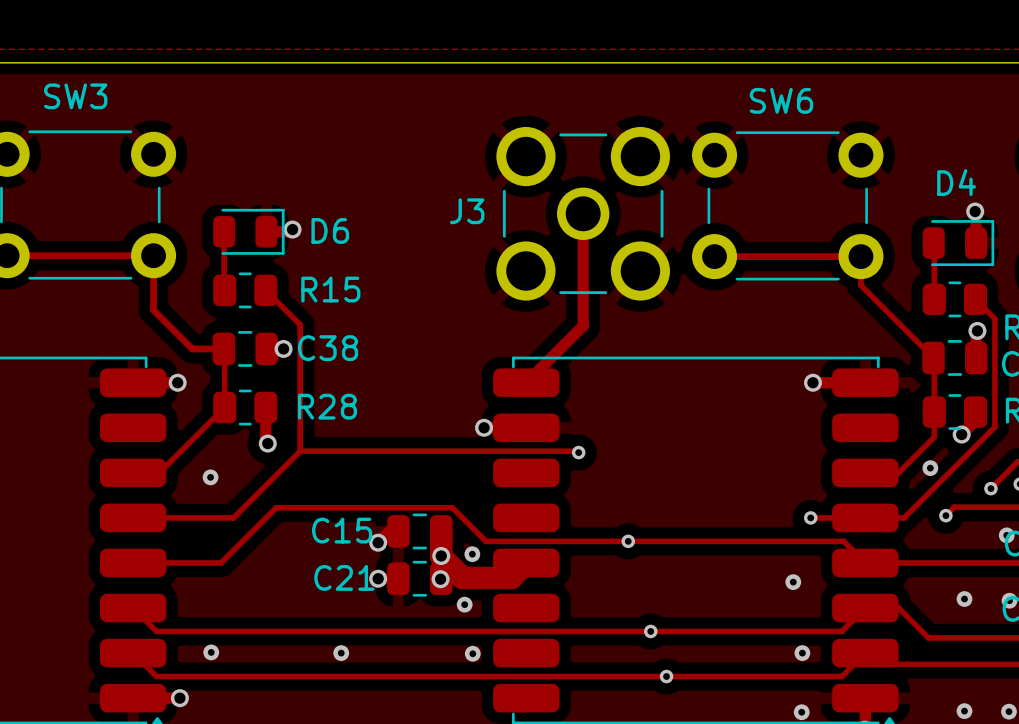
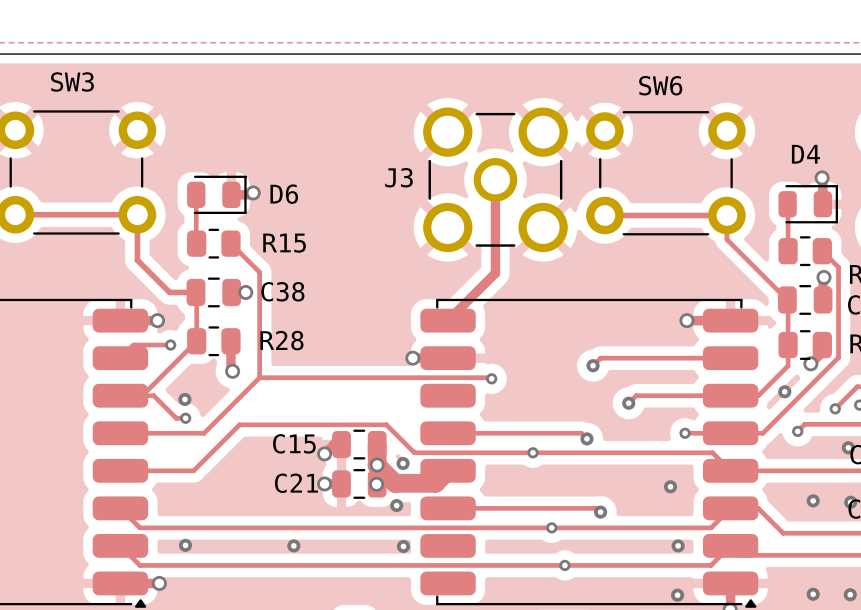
track: none -> (170, 345) (133, 345) (120, 358)
via: none -> (170, 345)
track: none -> (730, 358) (600, 358) (593, 365)
via: none -> (593, 365)
track: none -> (142, 395) (153, 395) (176, 418) (185, 418)
track: none -> (730, 395) (636, 395) (628, 403)
via: none -> (628, 403)
via: none -> (185, 418)
track: none -> (448, 433) (581, 433) (586, 438)
via: none -> (586, 438)
track: none -> (448, 508) (596, 508) (600, 512)
via: none -> (600, 512)

